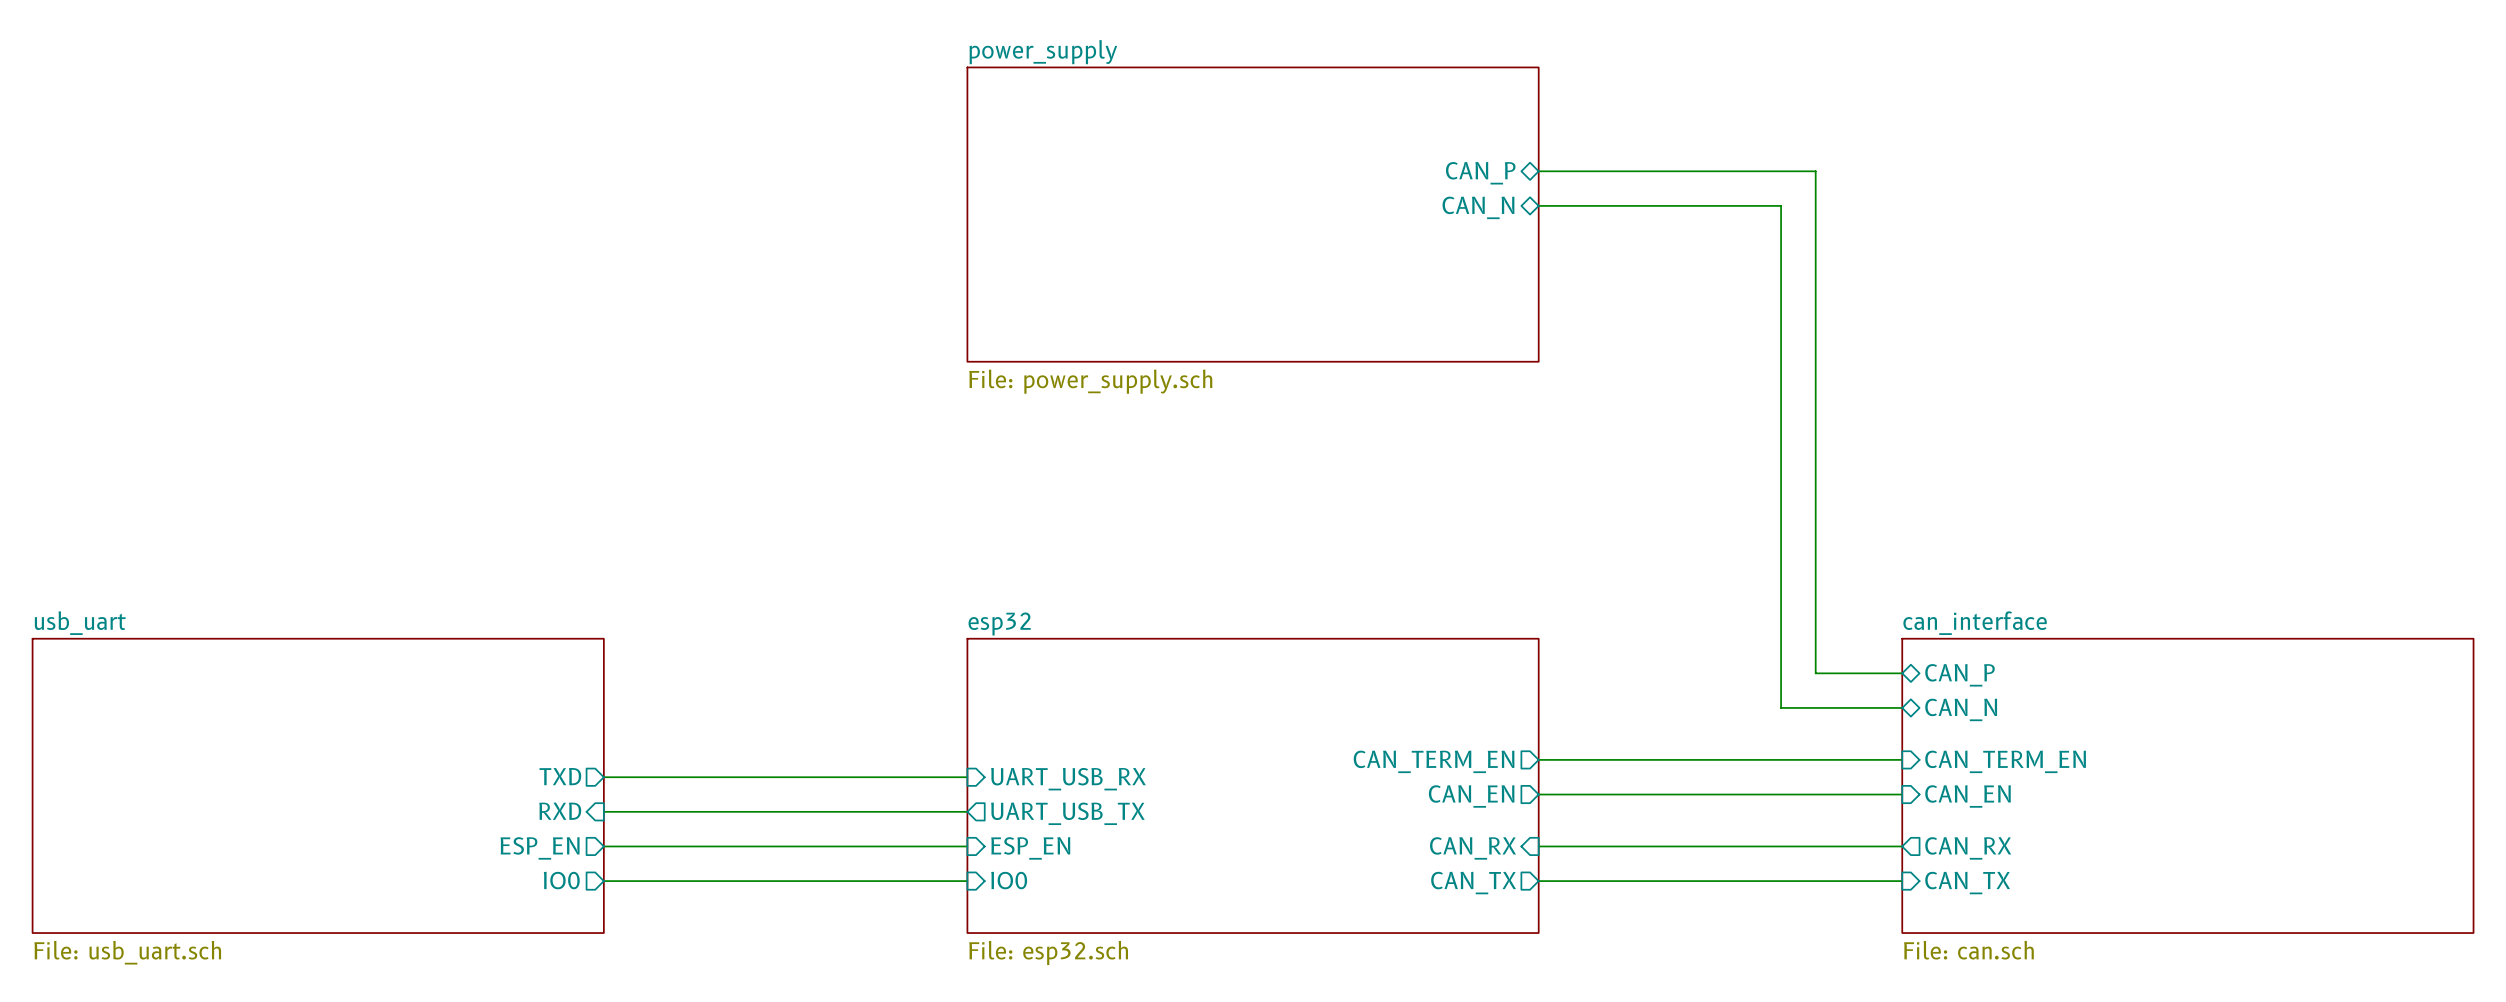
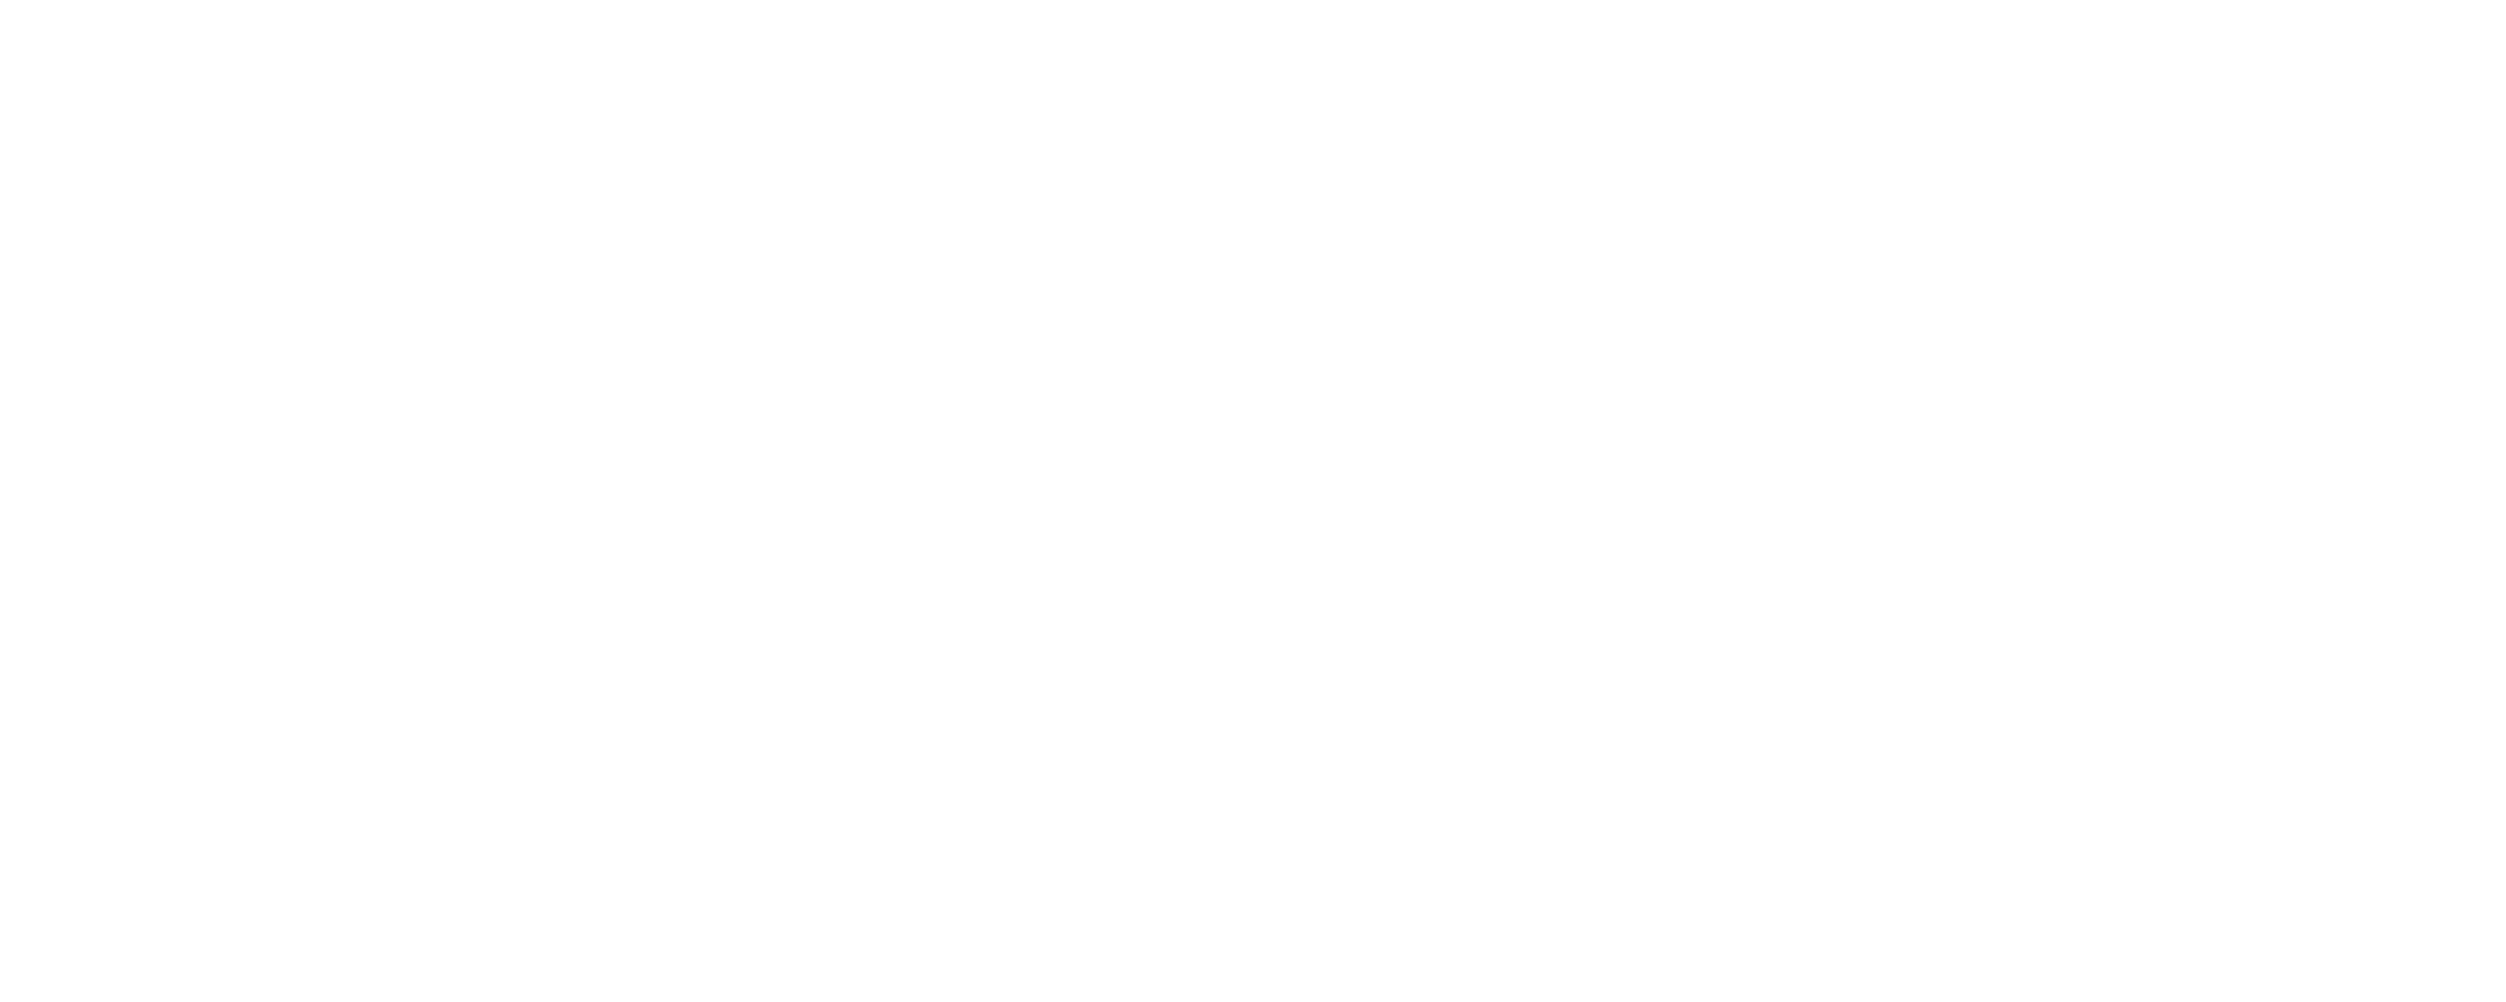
wire: (1538, 171) (1815, 171) (1815, 673) (1902, 673) -> none
sheet pin: CAN_P (1480, 173) -> none
wire: (1538, 205) (1781, 205) (1781, 707) (1902, 707) -> none
sheet pin: CAN_N (1478, 207) -> none
sheet power_supply: File: power_supply.sch (1253, 214) -> none
sheet pin: CAN_P (1959, 675) -> none
sheet pin: CAN_N (1961, 709) -> none
wire: (1538, 759) (1902, 759) -> none
sheet pin: CAN_TERM_EN (1434, 761) -> none
sheet pin: CAN_TERM_EN (2005, 761) -> none
sheet pin: TXD (560, 776) -> none
wire: (603, 777) (967, 777) -> none
sheet pin: UART_USB_RX (1068, 779) -> none
sheet usb_uart: File: usb_uart.sch (318, 785) -> none
sheet esp32: File: esp32.sch (1253, 785) -> none
sheet can_interface: File: can.sch (2187, 785) -> none
wire: (1538, 794) (1902, 794) -> none
sheet pin: CAN_EN (1471, 796) -> none
sheet pin: CAN_EN (1967, 796) -> none
sheet pin: RXD (560, 811) -> none
wire: (603, 811) (967, 811) -> none
sheet pin: UART_USB_TX (1067, 813) -> none
wire: (603, 846) (967, 846) -> none
wire: (1538, 846) (1902, 846) -> none
sheet pin: ESP_EN (540, 848) -> none
sheet pin: ESP_EN (1030, 848) -> none
sheet pin: CAN_RX (1472, 848) -> none
sheet pin: CAN_RX (1968, 848) -> none
sheet pin: IO0 (561, 880) -> none
sheet pin: IO0 (1009, 880) -> none
wire: (603, 881) (967, 881) -> none
wire: (1538, 881) (1902, 881) -> none
sheet pin: CAN_TX (1473, 883) -> none
sheet pin: CAN_TX (1967, 883) -> none

